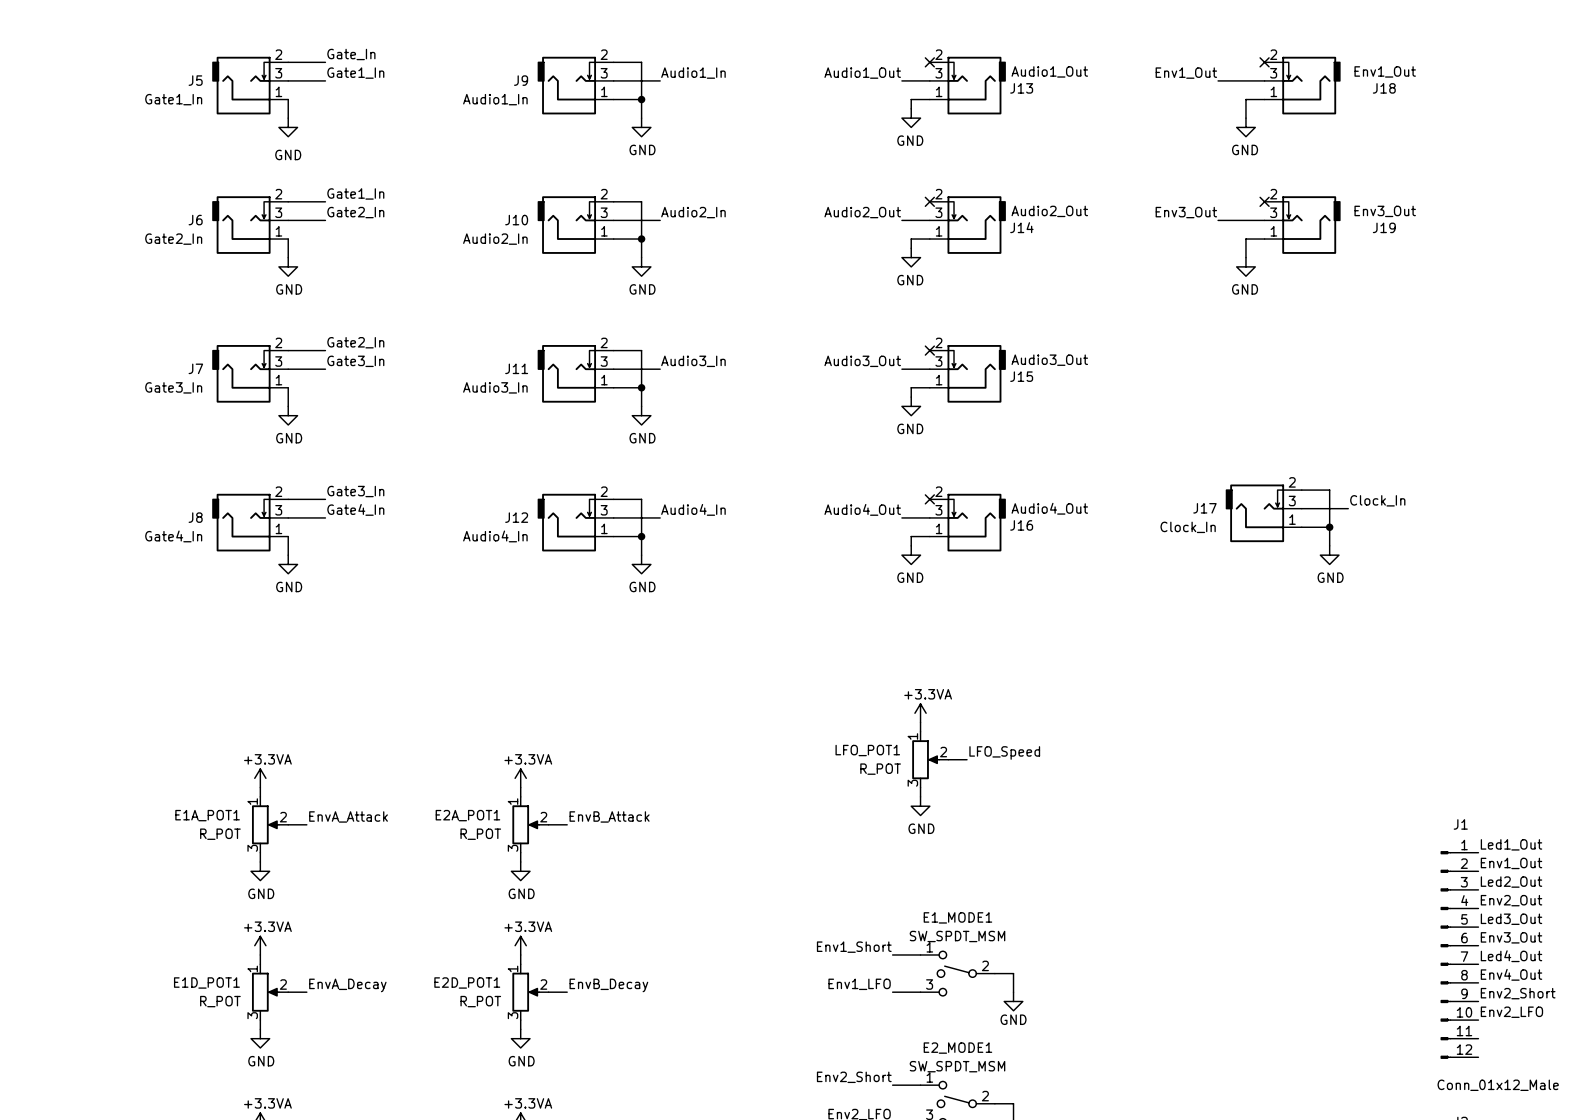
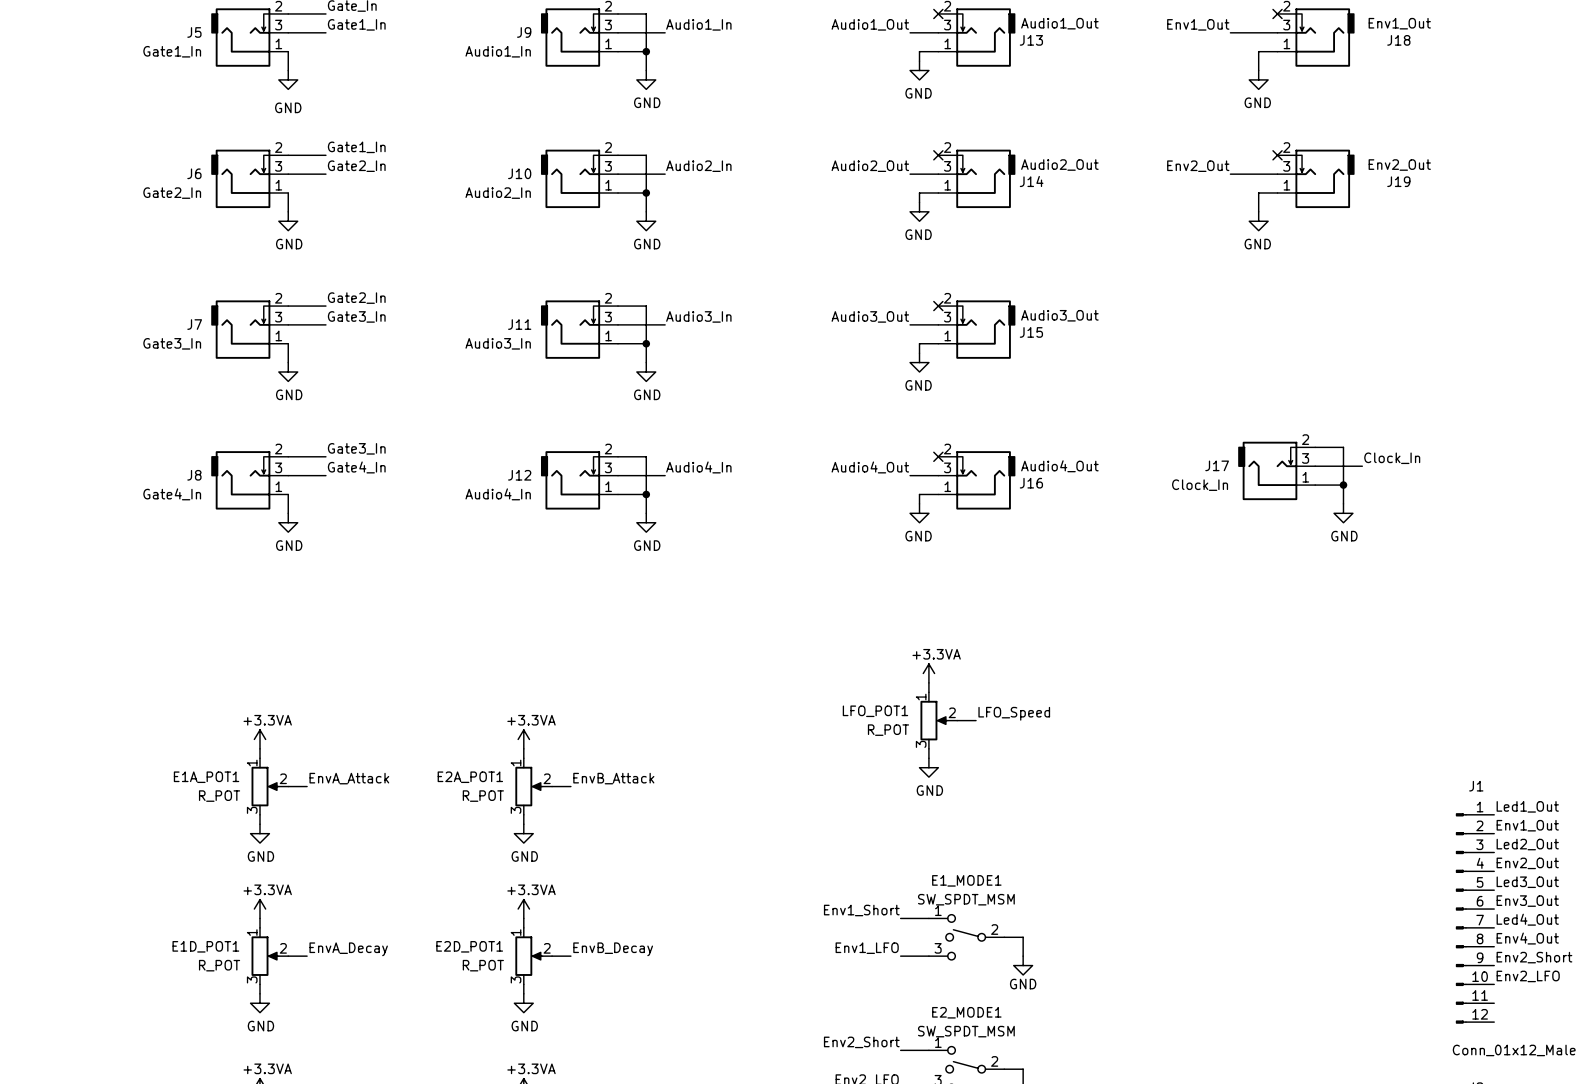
J19 value: Env3_Out (1385, 211) -> Env2_Out (1399, 165)
label: Env3_Out (1186, 212) -> Env2_Out (1198, 166)

